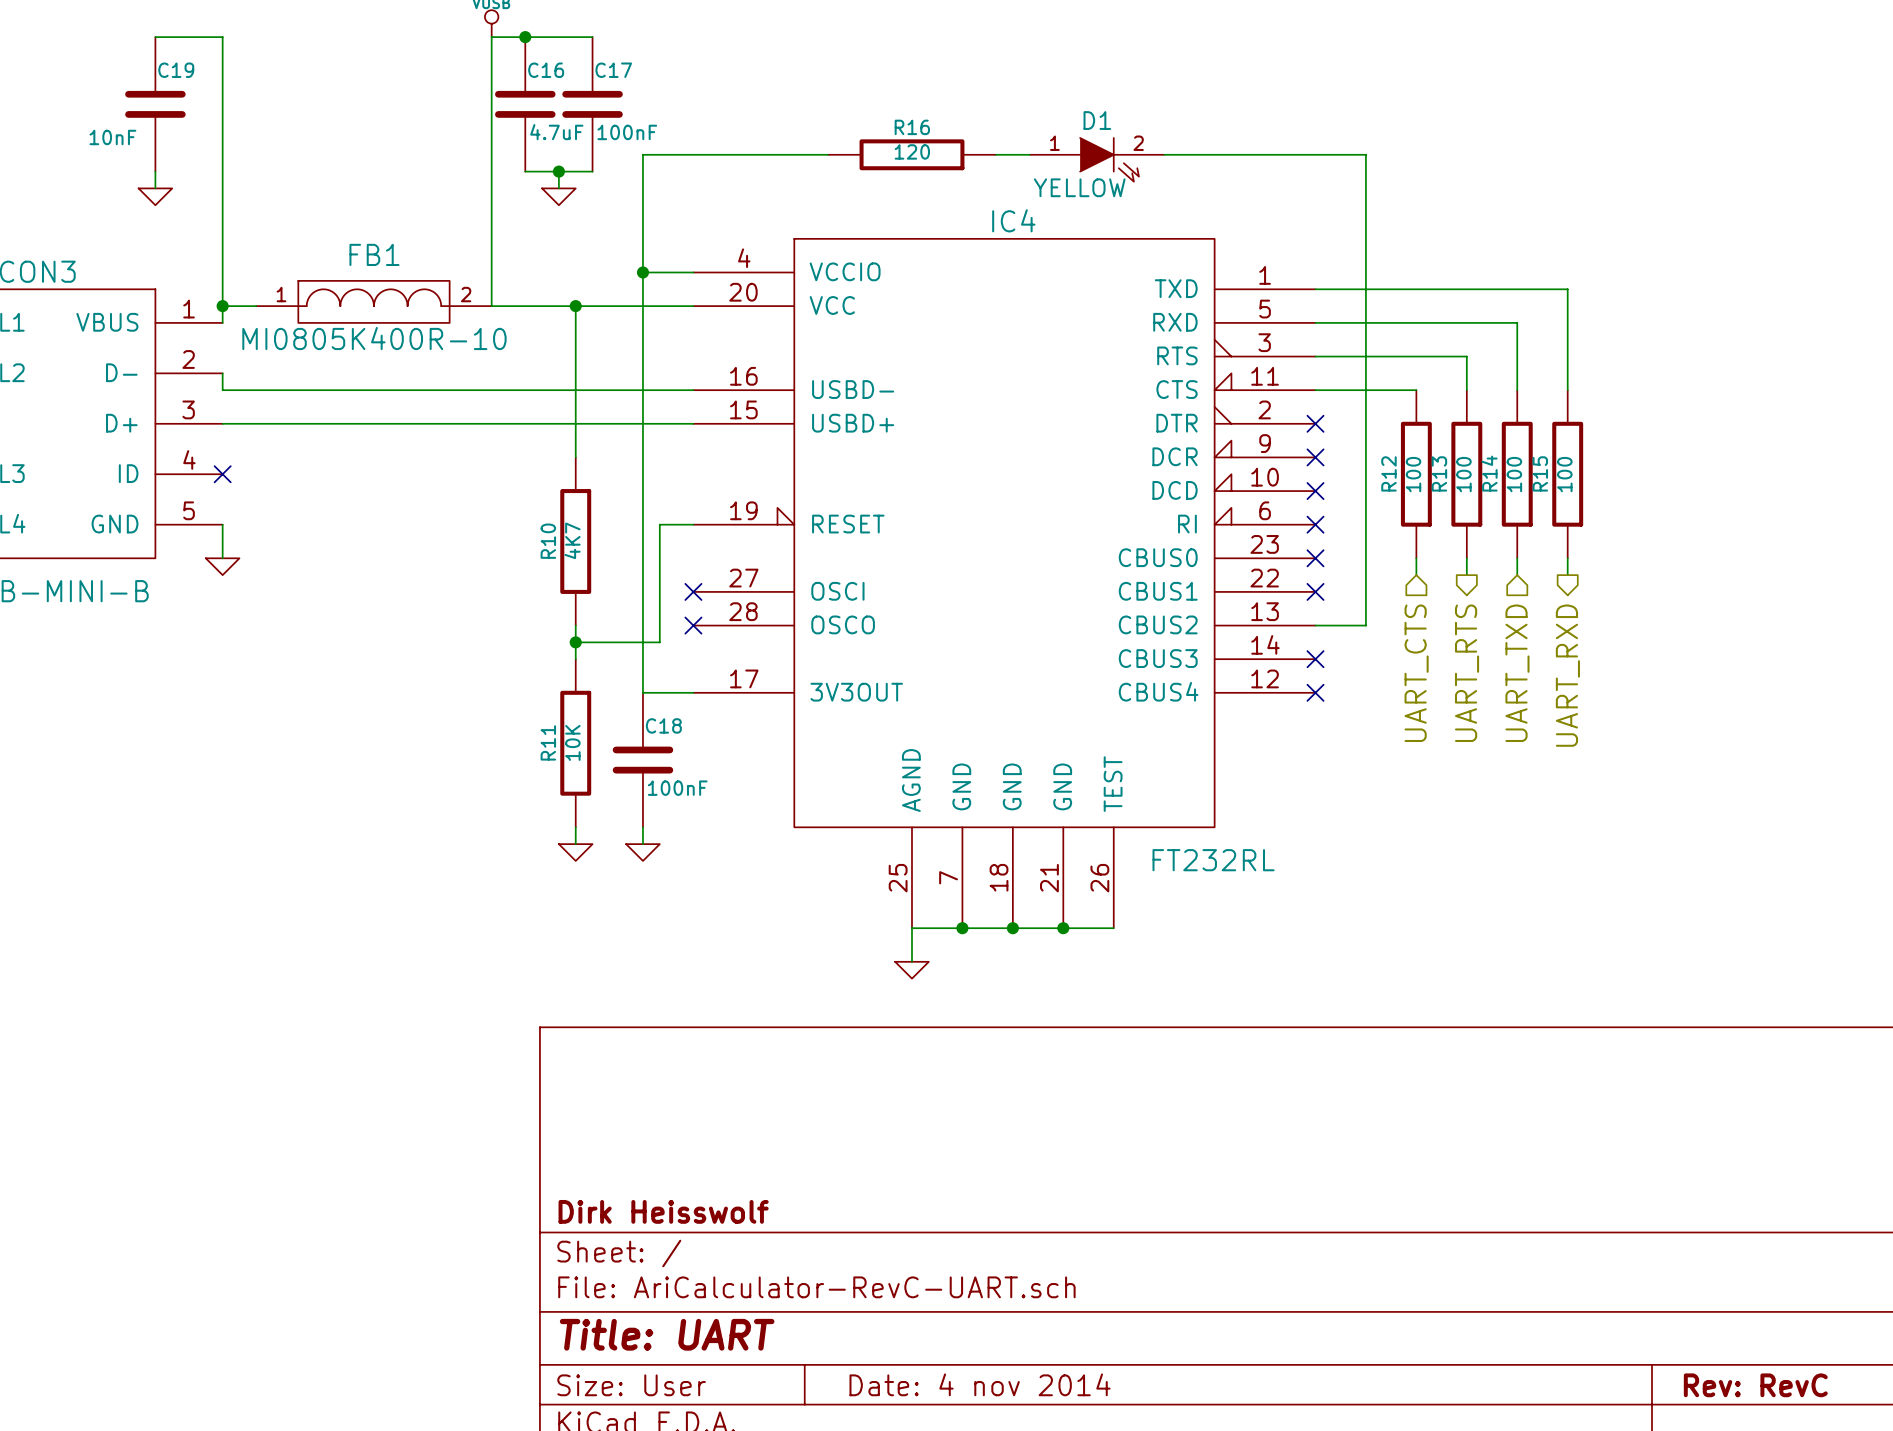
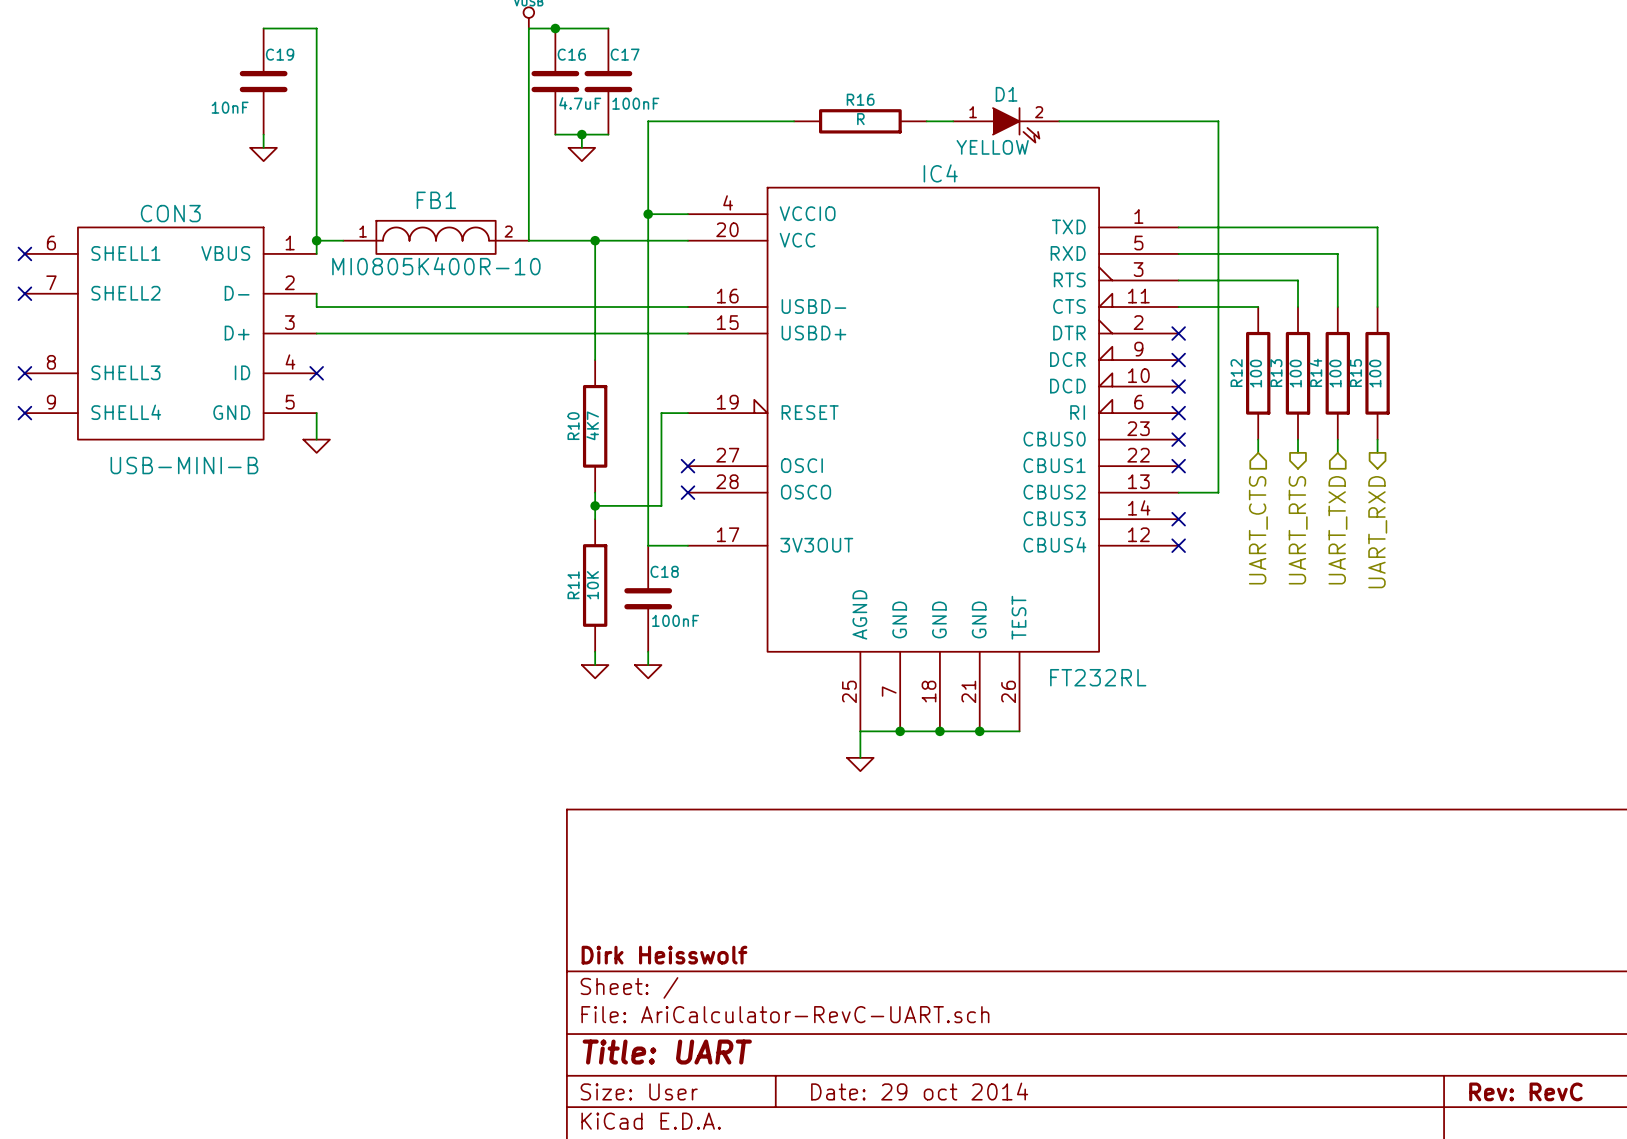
R16 value: 120 (912, 151) -> R (860, 119)
title block: Date: 4 nov 2014 (980, 1384) -> Date: 29 oct 2014 (919, 1091)

